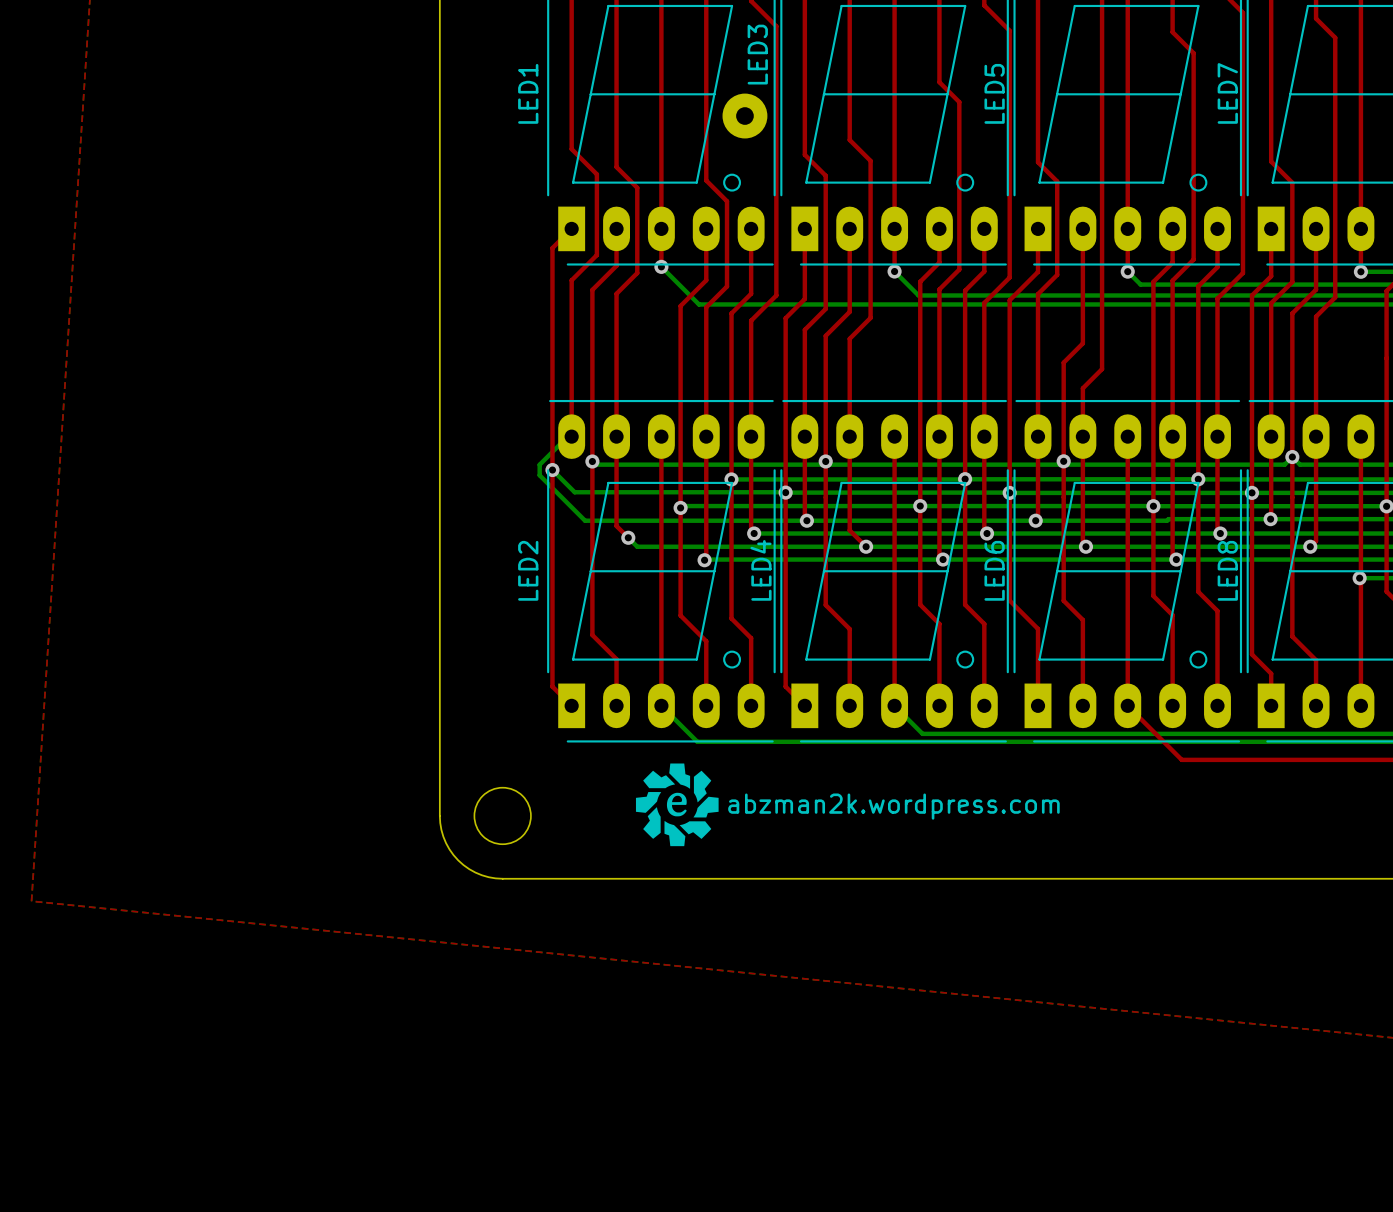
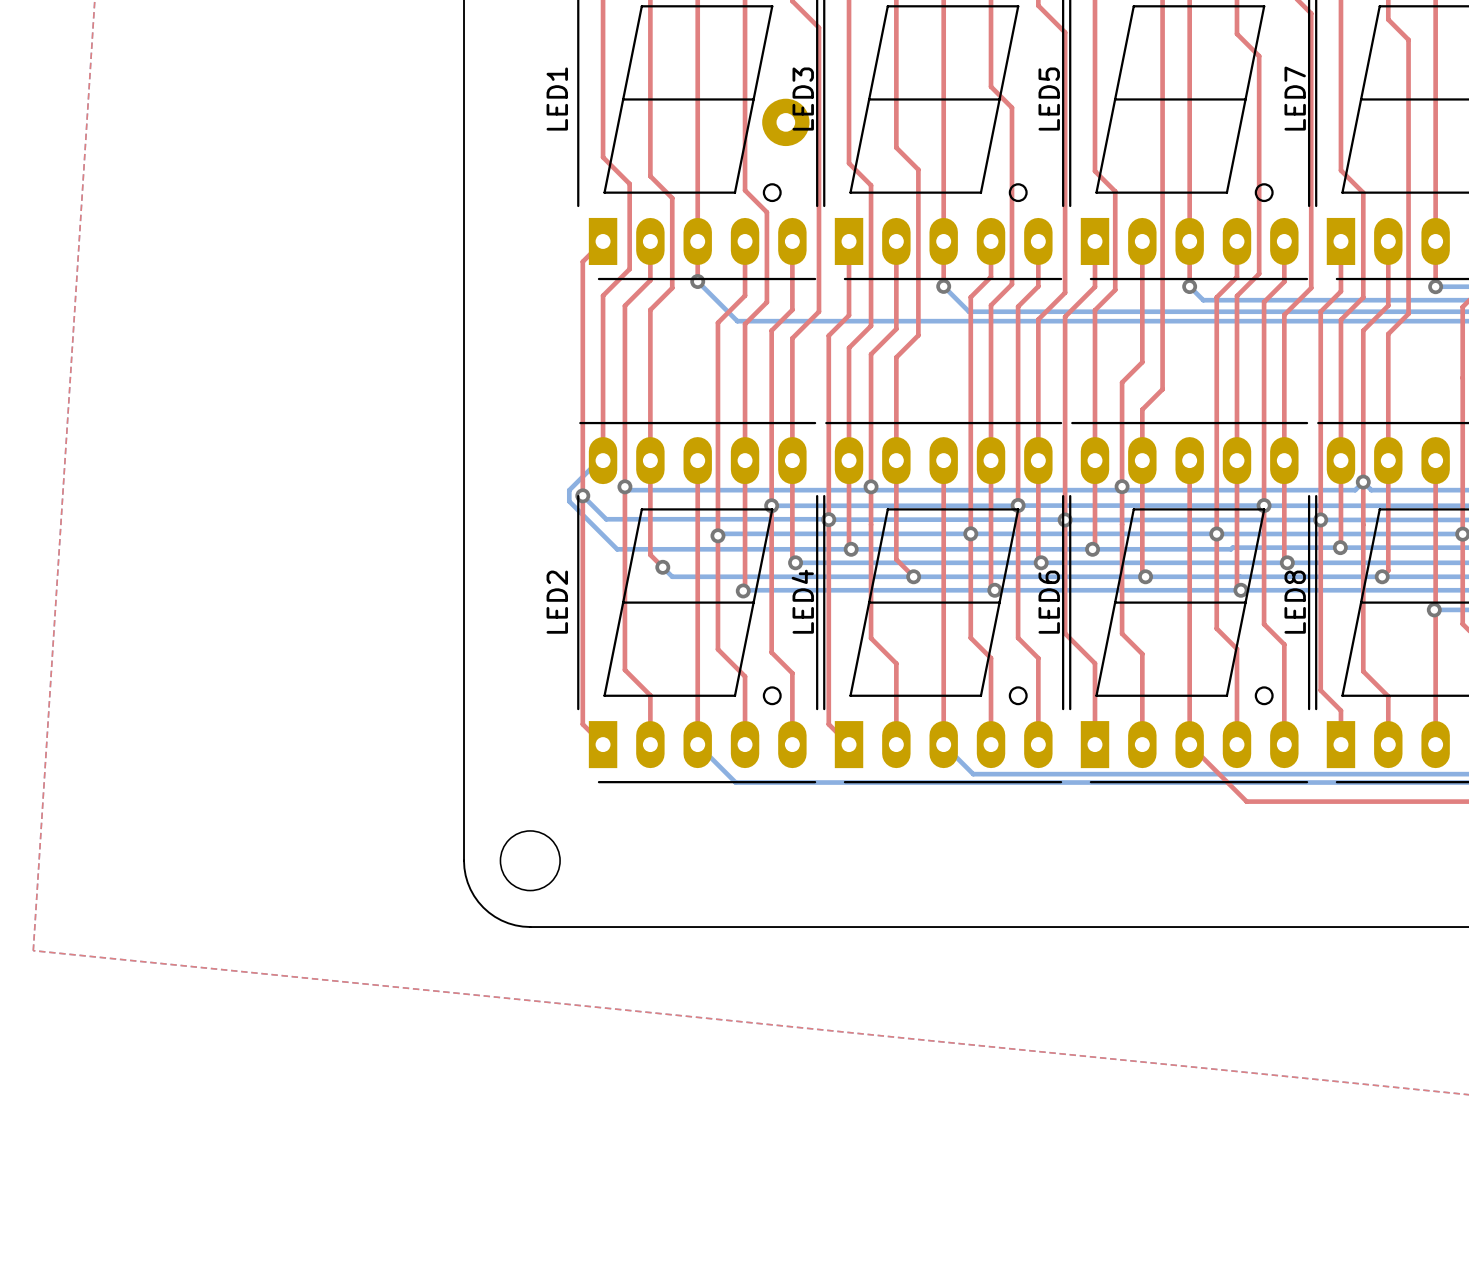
LED3 name position: LED3 (757, 54) -> LED3 (803, 99)
drawing: [635, 763, 719, 847] -> none
text: abzman2k.wordpress.com (893, 806) -> none

